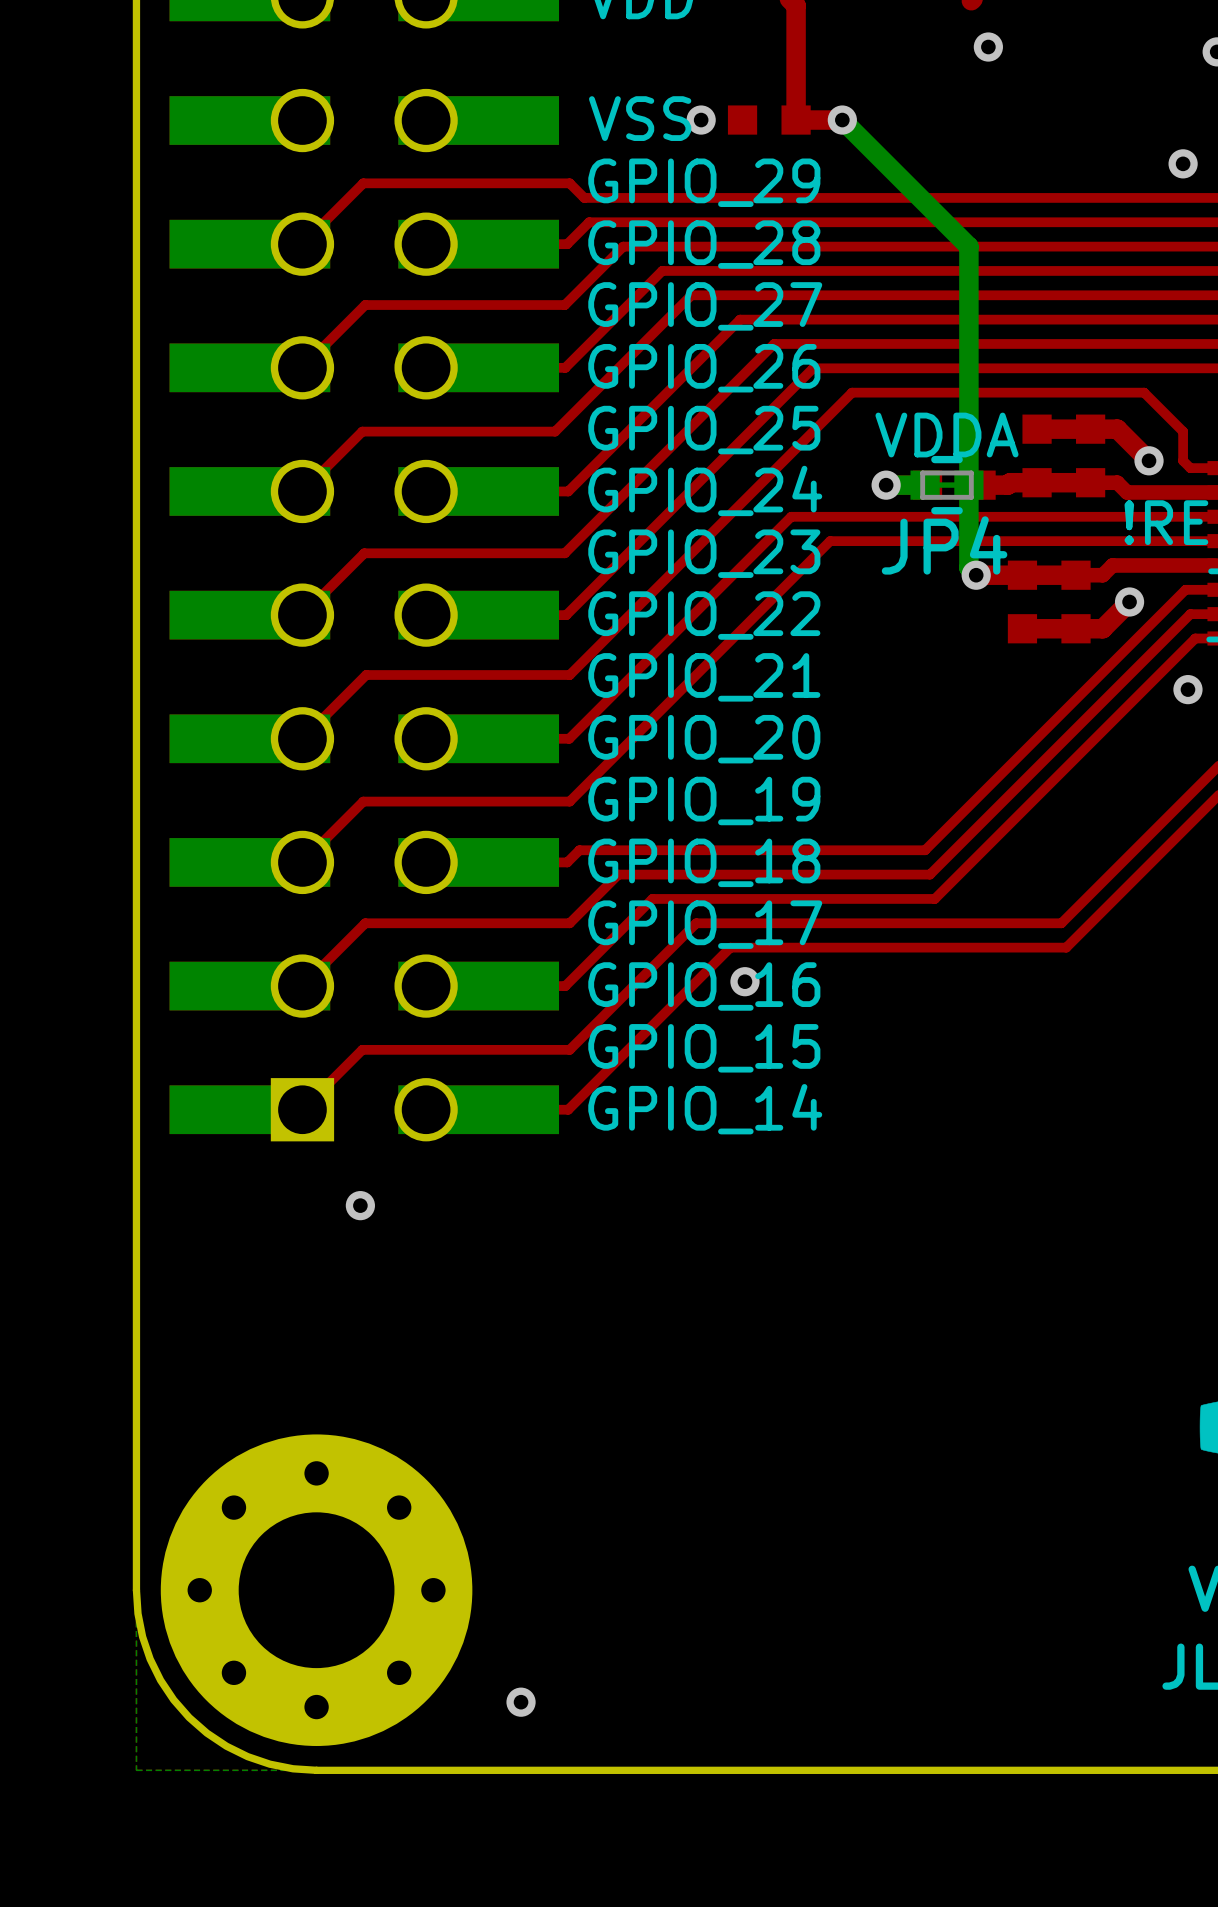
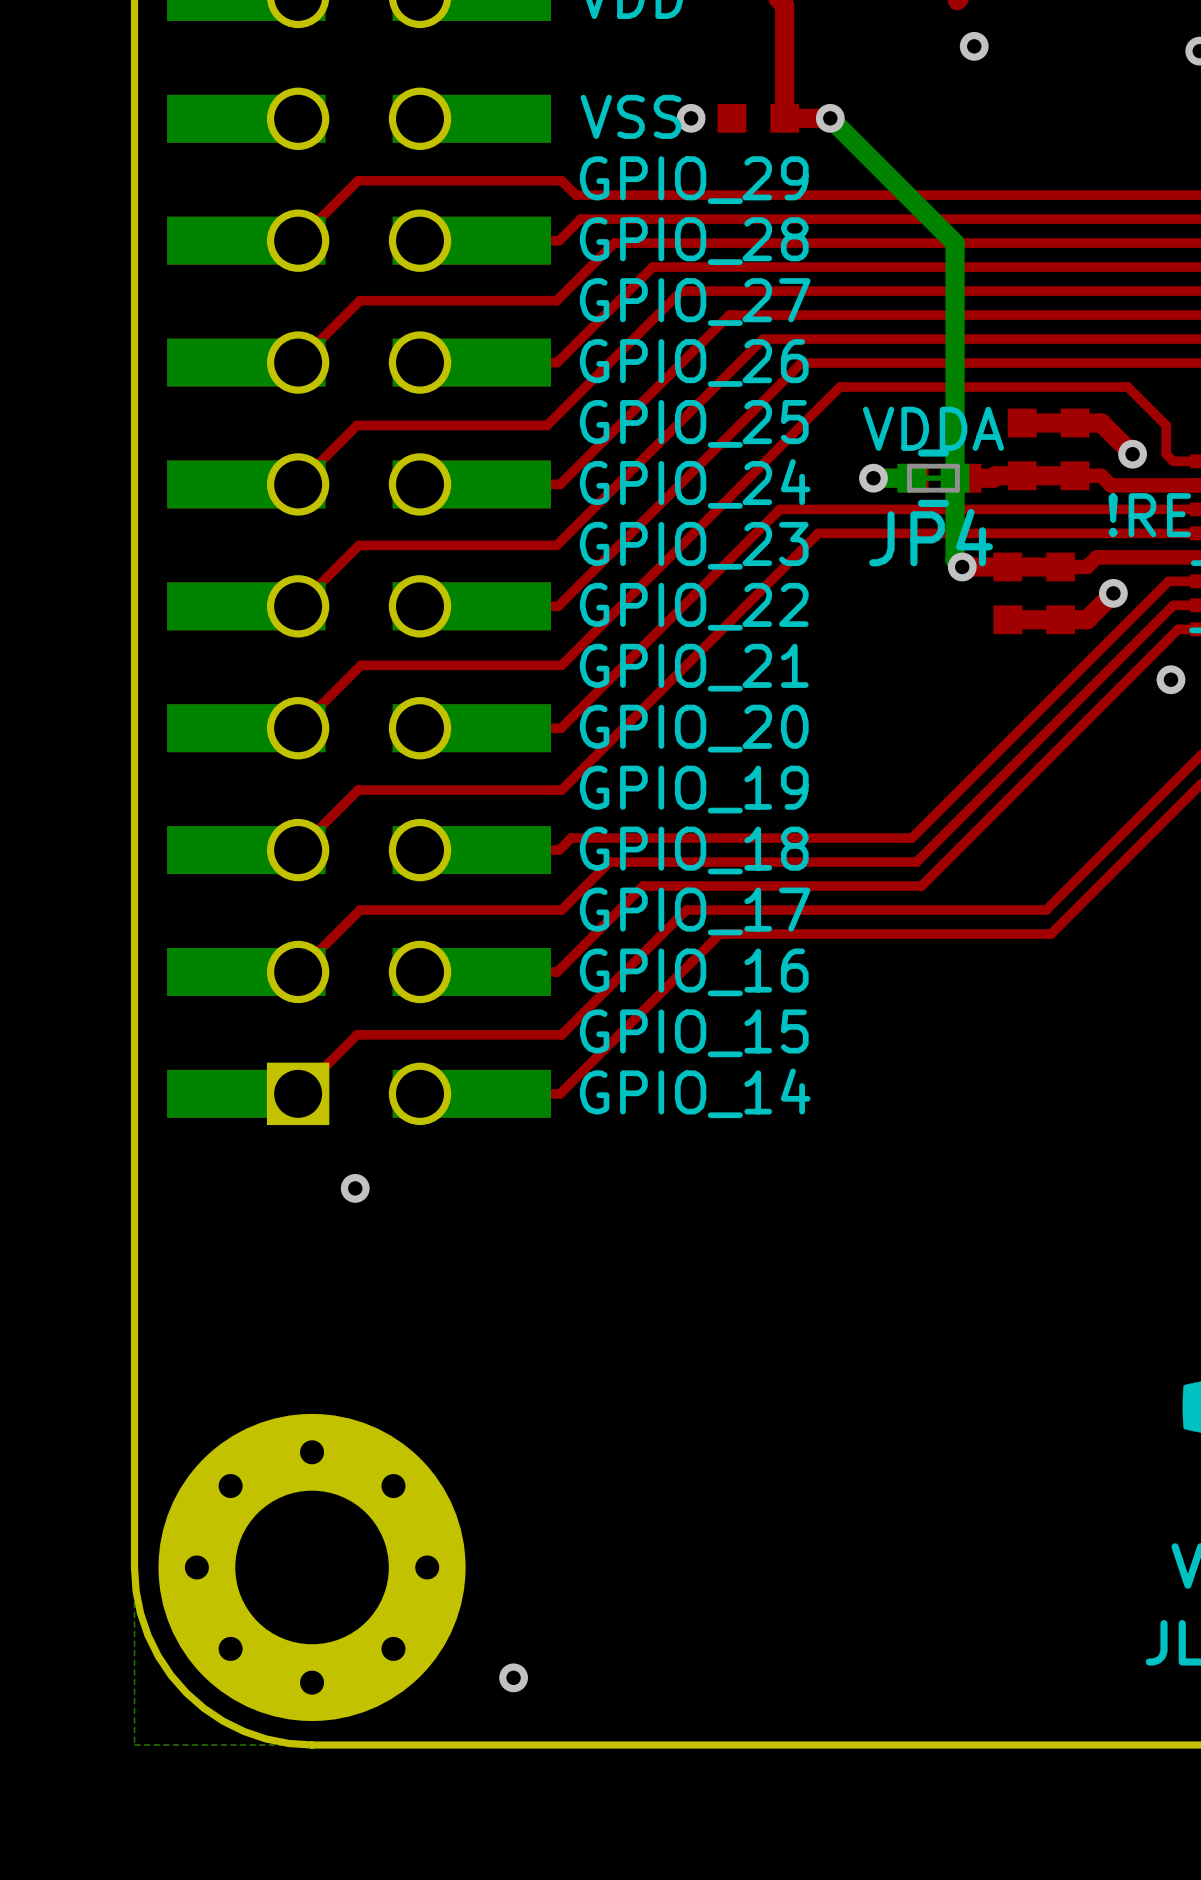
via: (1183, 163) -> none
via: (744, 981) -> none

